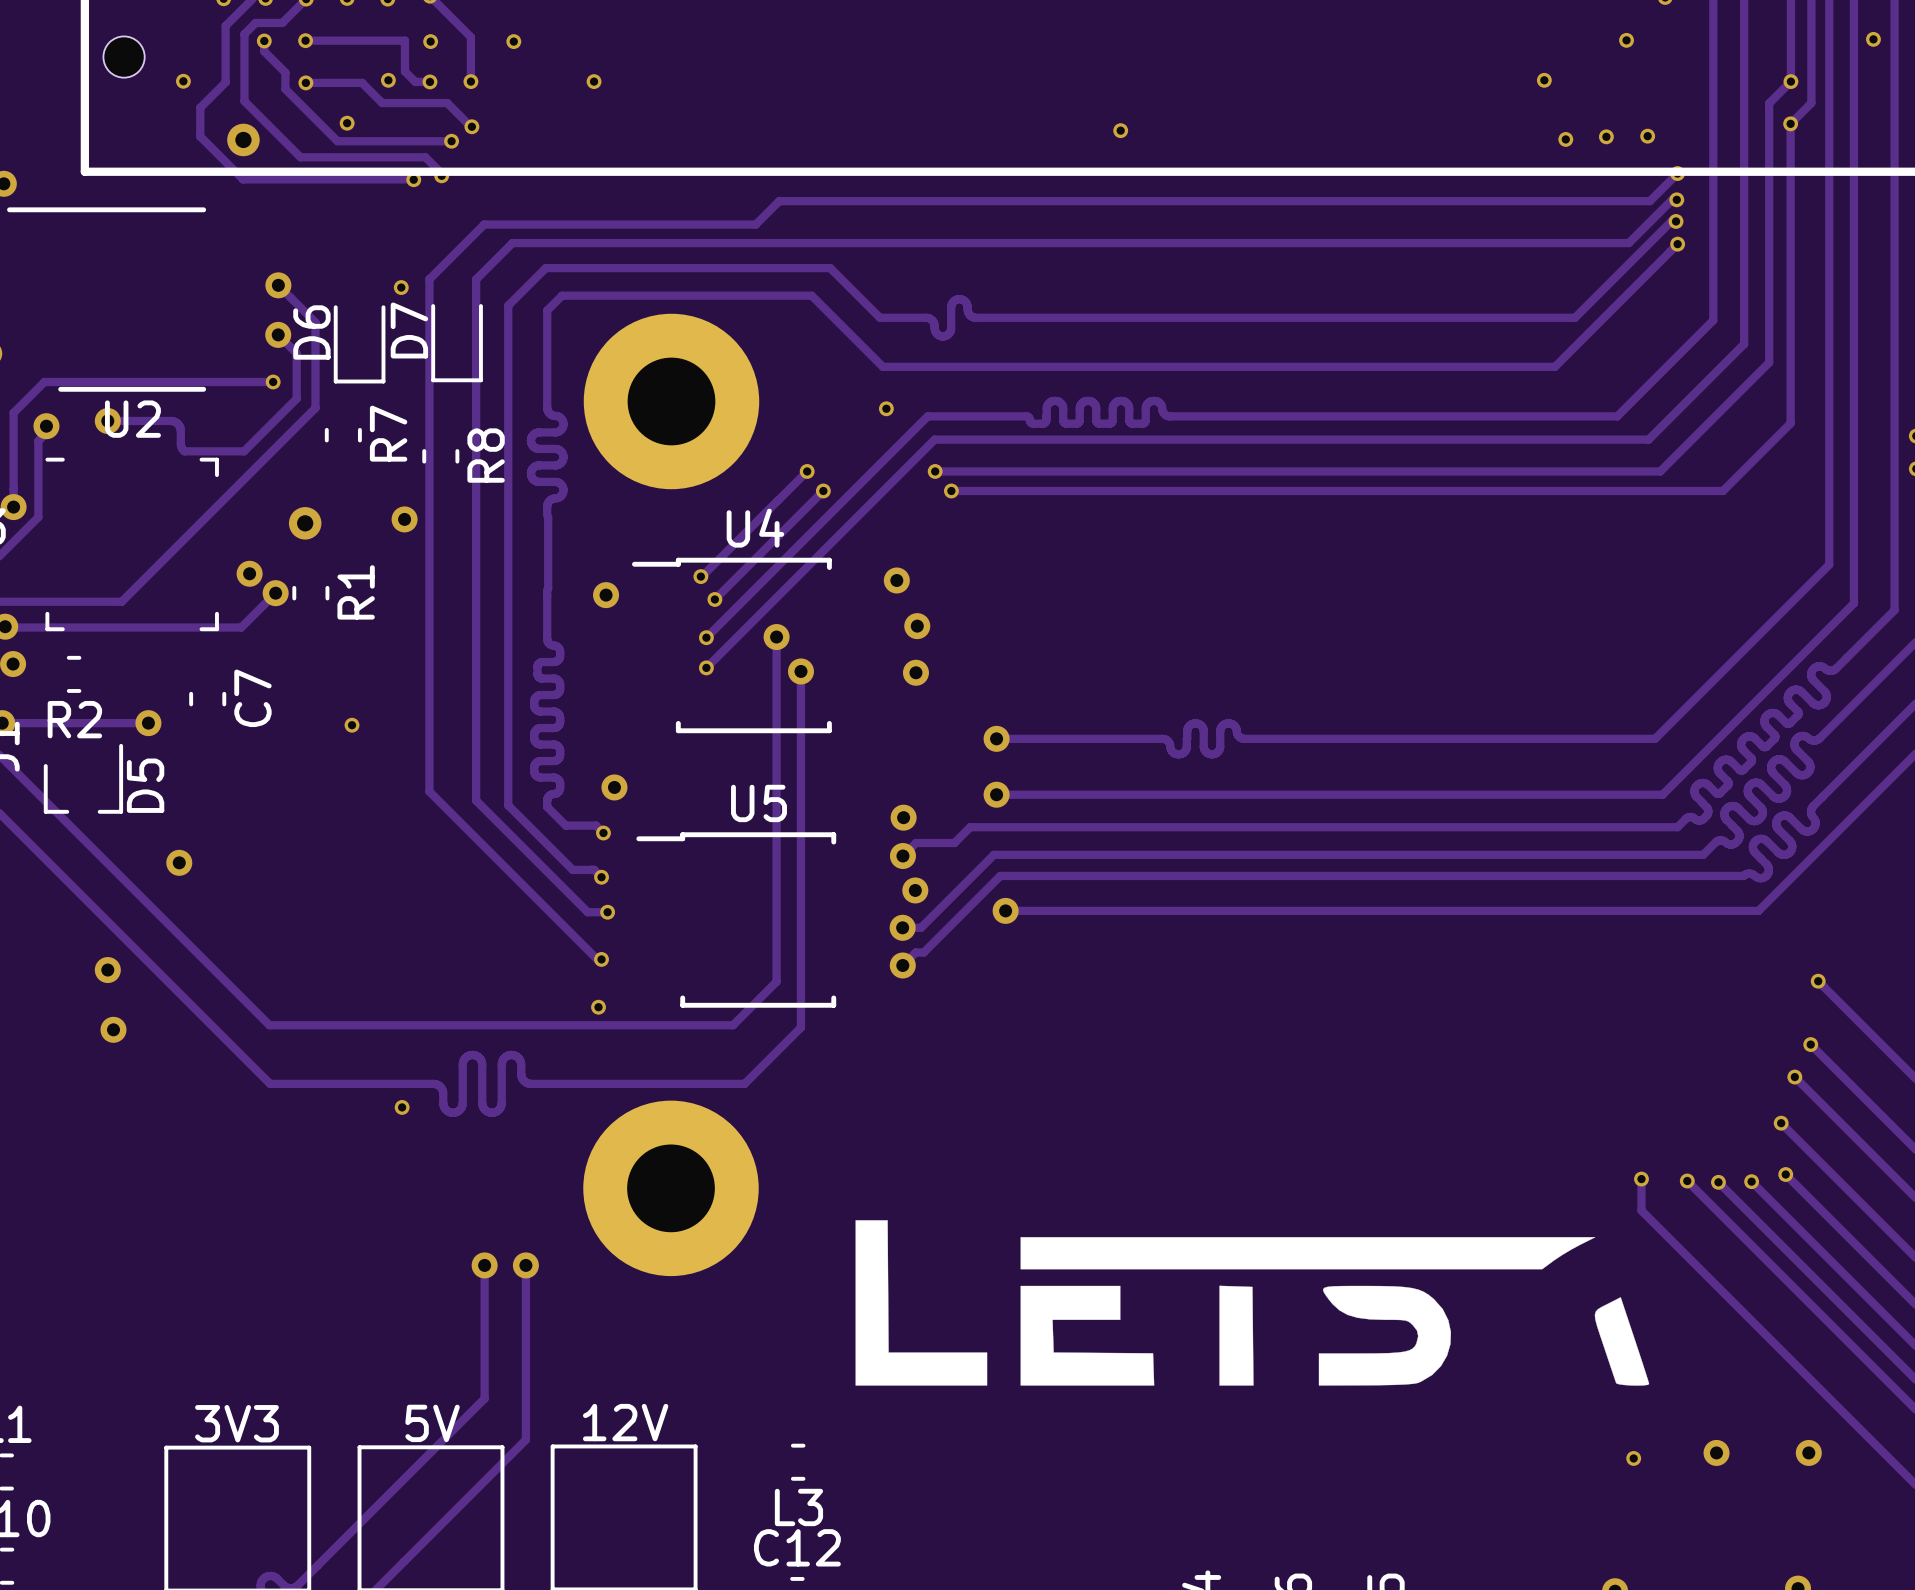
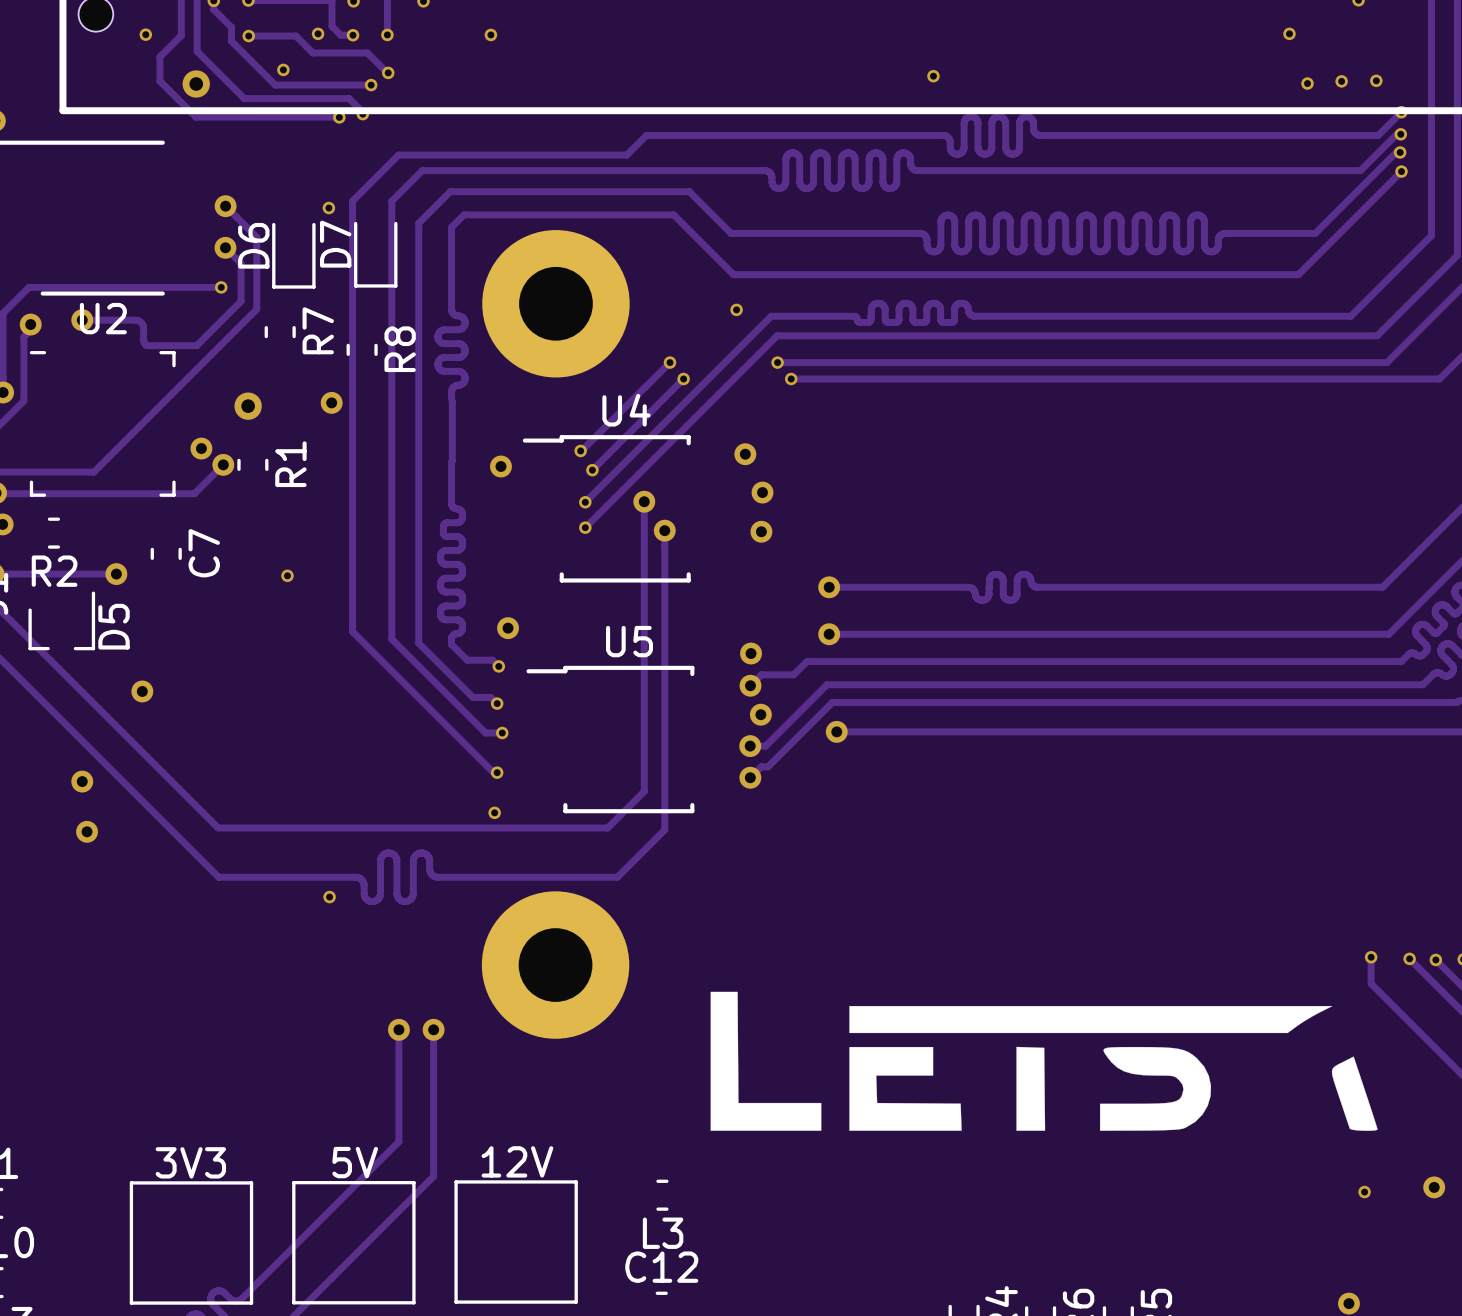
track: (1132, 201) (1247, 201) -> (943, 135) (949, 139) (951, 151) (957, 154) (961, 152) (963, 148) (964, 121) (969, 116) (974, 117) (977, 120) (978, 148) (983, 154) (987, 153) (991, 150) (992, 121) (997, 116) (1001, 117) (1005, 121) (1005, 148) (1009, 153) (1015, 153) (1018, 150) (1019, 121) (1023, 117) (1028, 116) (1031, 119) (1034, 131) (1040, 135)
track: (920, 243) (1101, 243) -> (765, 170) (771, 174) (774, 186) (778, 188) (783, 186) (785, 181) (785, 158) (788, 154) (792, 152) (797, 154) (799, 158) (799, 183) (805, 188) (809, 187) (812, 184) (813, 158) (818, 152) (823, 153) (826, 156) (827, 183) (832, 188) (837, 187) (840, 184) (841, 158) (846, 152) (851, 153) (854, 156) (855, 183) (860, 188) (865, 187) (868, 184) (869, 158) (874, 152) (878, 153) (882, 156) (883, 183) (886, 187) (892, 187) (896, 184) (896, 158) (900, 153) (905, 152) (909, 155) (911, 166) (917, 170)
track: (926, 317) (932, 320) (936, 333) (942, 336) (950, 331) (951, 305) (955, 299) (964, 300) (969, 314) (975, 317) -> (770, 233) (811, 233)
track: (1104, 317) (1467, 317) -> (920, 233) (926, 237) (929, 250) (933, 251) (938, 250) (940, 244) (941, 220) (943, 216) (947, 215) (952, 216) (954, 220) (955, 247) (961, 251) (966, 250) (968, 246) (969, 218) (975, 215) (979, 216) (982, 220) (983, 247) (989, 251) (993, 250) (996, 246) (997, 218) (1003, 215) (1007, 216) (1010, 220) (1010, 247) (1017, 251) (1021, 250) (1023, 246) (1024, 218) (1031, 215) (1035, 216) (1037, 220) (1038, 247) (1044, 251) (1049, 250) (1051, 246) (1052, 218) (1058, 215) (1063, 216) (1065, 220) (1066, 247) (1072, 251) (1076, 250) (1079, 246) (1079, 220) (1084, 215) (1089, 215) (1092, 218) (1093, 246) (1098, 251) (1103, 251) (1106, 247) (1107, 220) (1112, 215) (1117, 215) (1120, 218) (1121, 246) (1126, 251) (1131, 251) (1134, 247) (1135, 220) (1140, 215) (1145, 215) (1148, 218) (1149, 246) (1154, 251) (1158, 251) (1162, 247) (1162, 220) (1168, 215) (1172, 215) (1175, 218) (1176, 246) (1182, 251) (1186, 251) (1190, 246) (1190, 220) (1194, 215) (1200, 215) (1203, 218) (1204, 246) (1208, 251) (1212, 251) (1216, 249) (1218, 237) (1225, 233)

